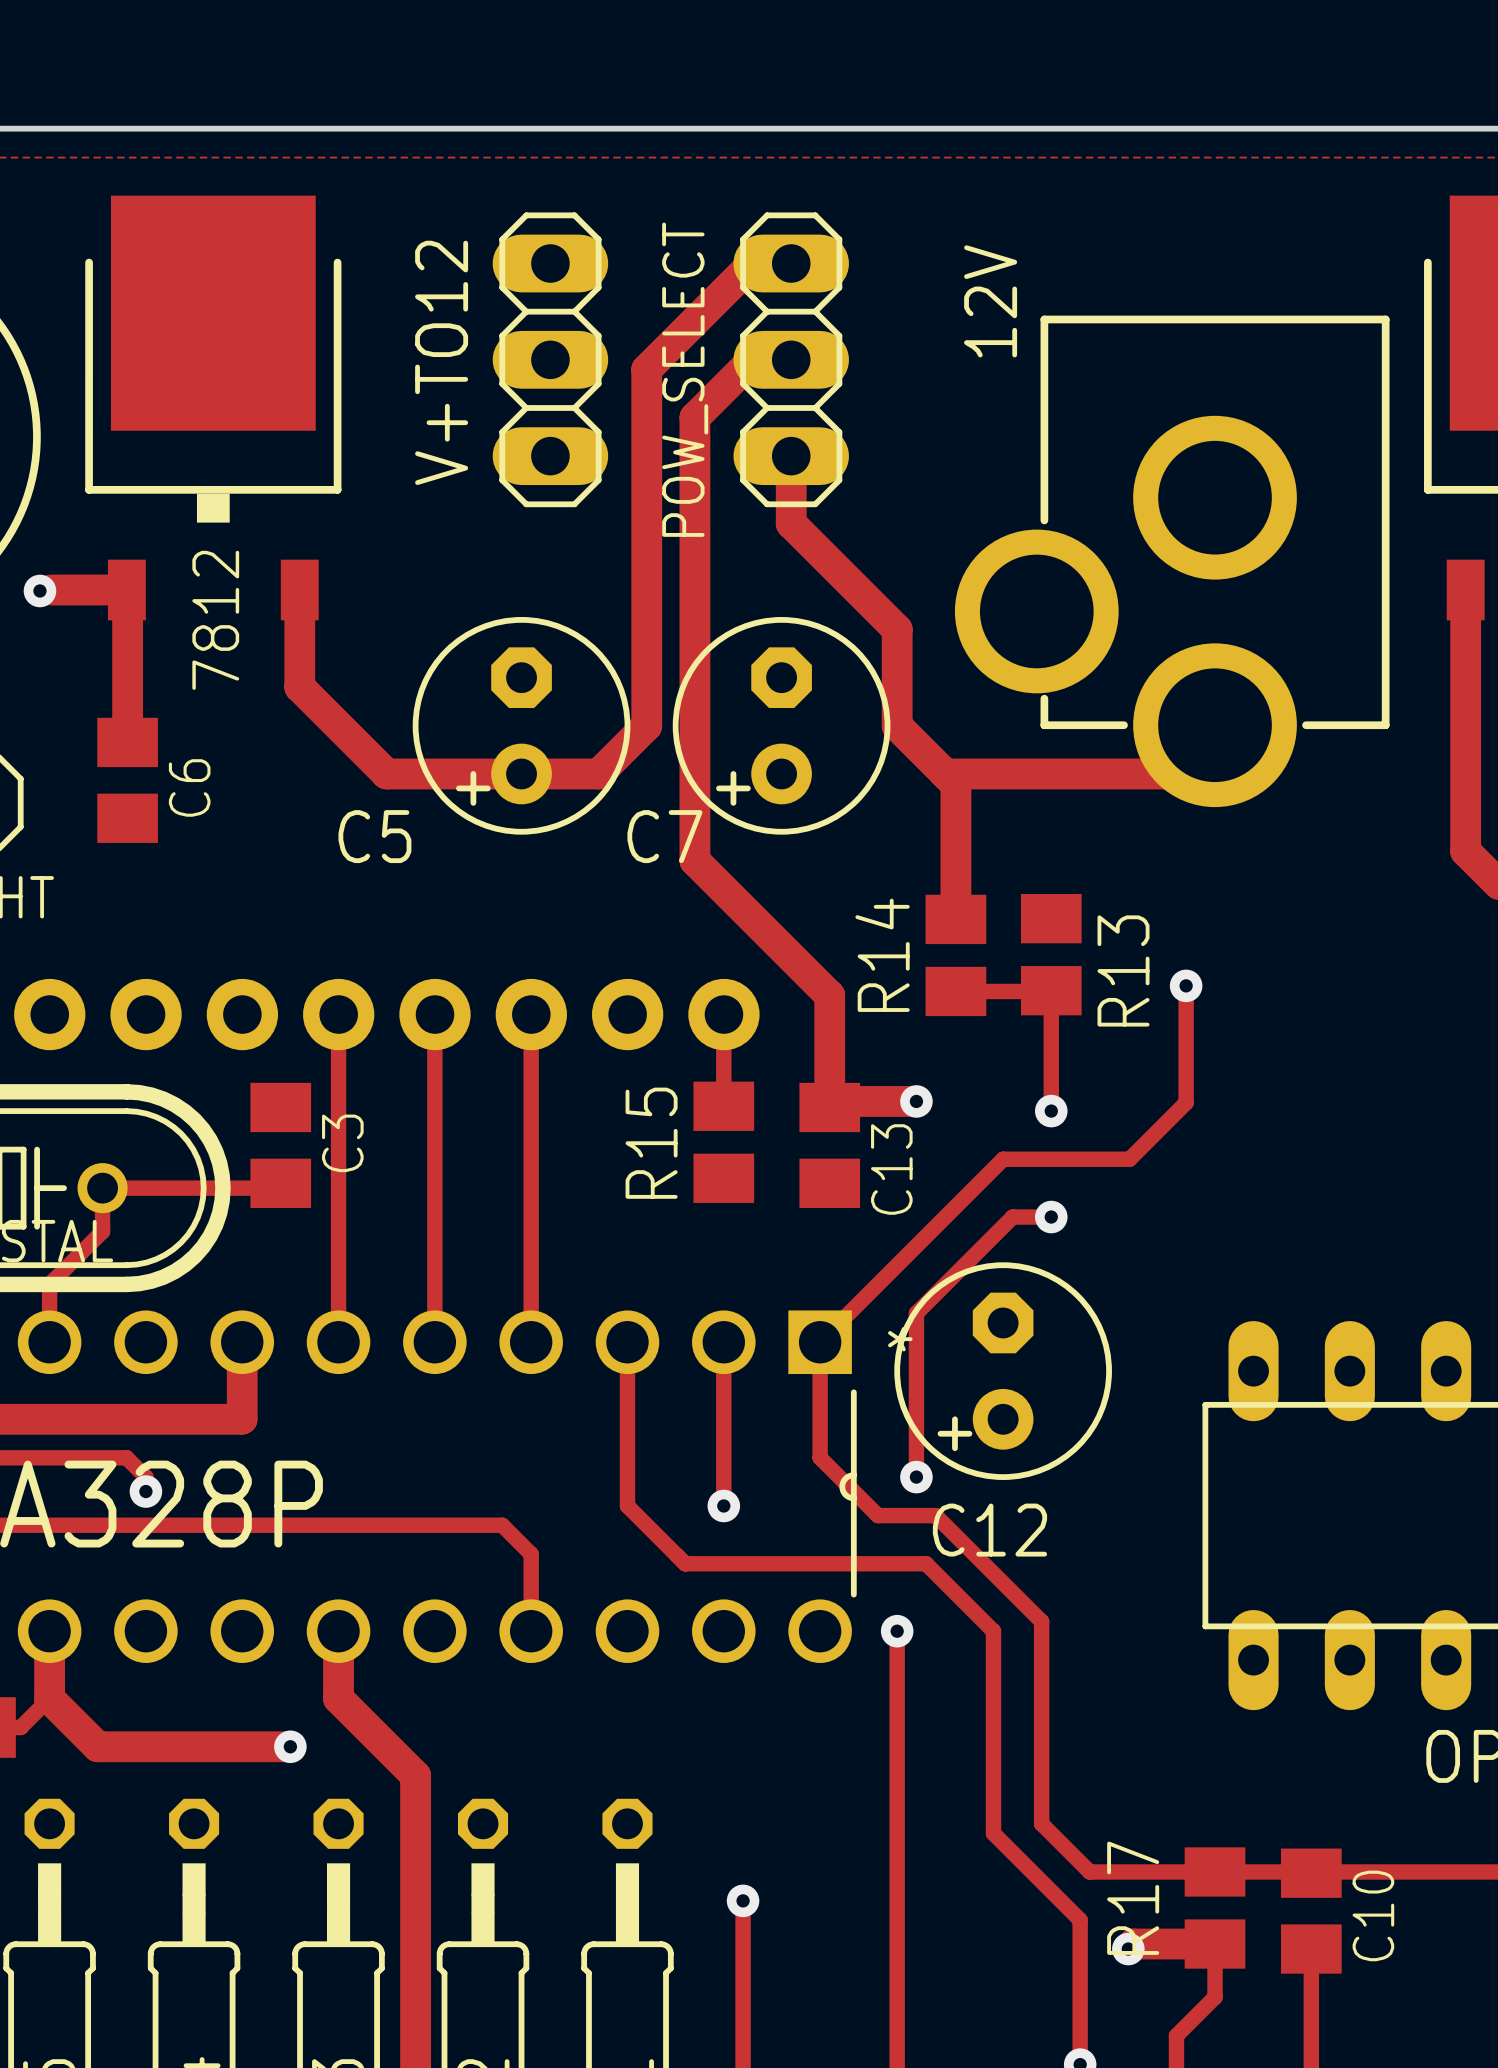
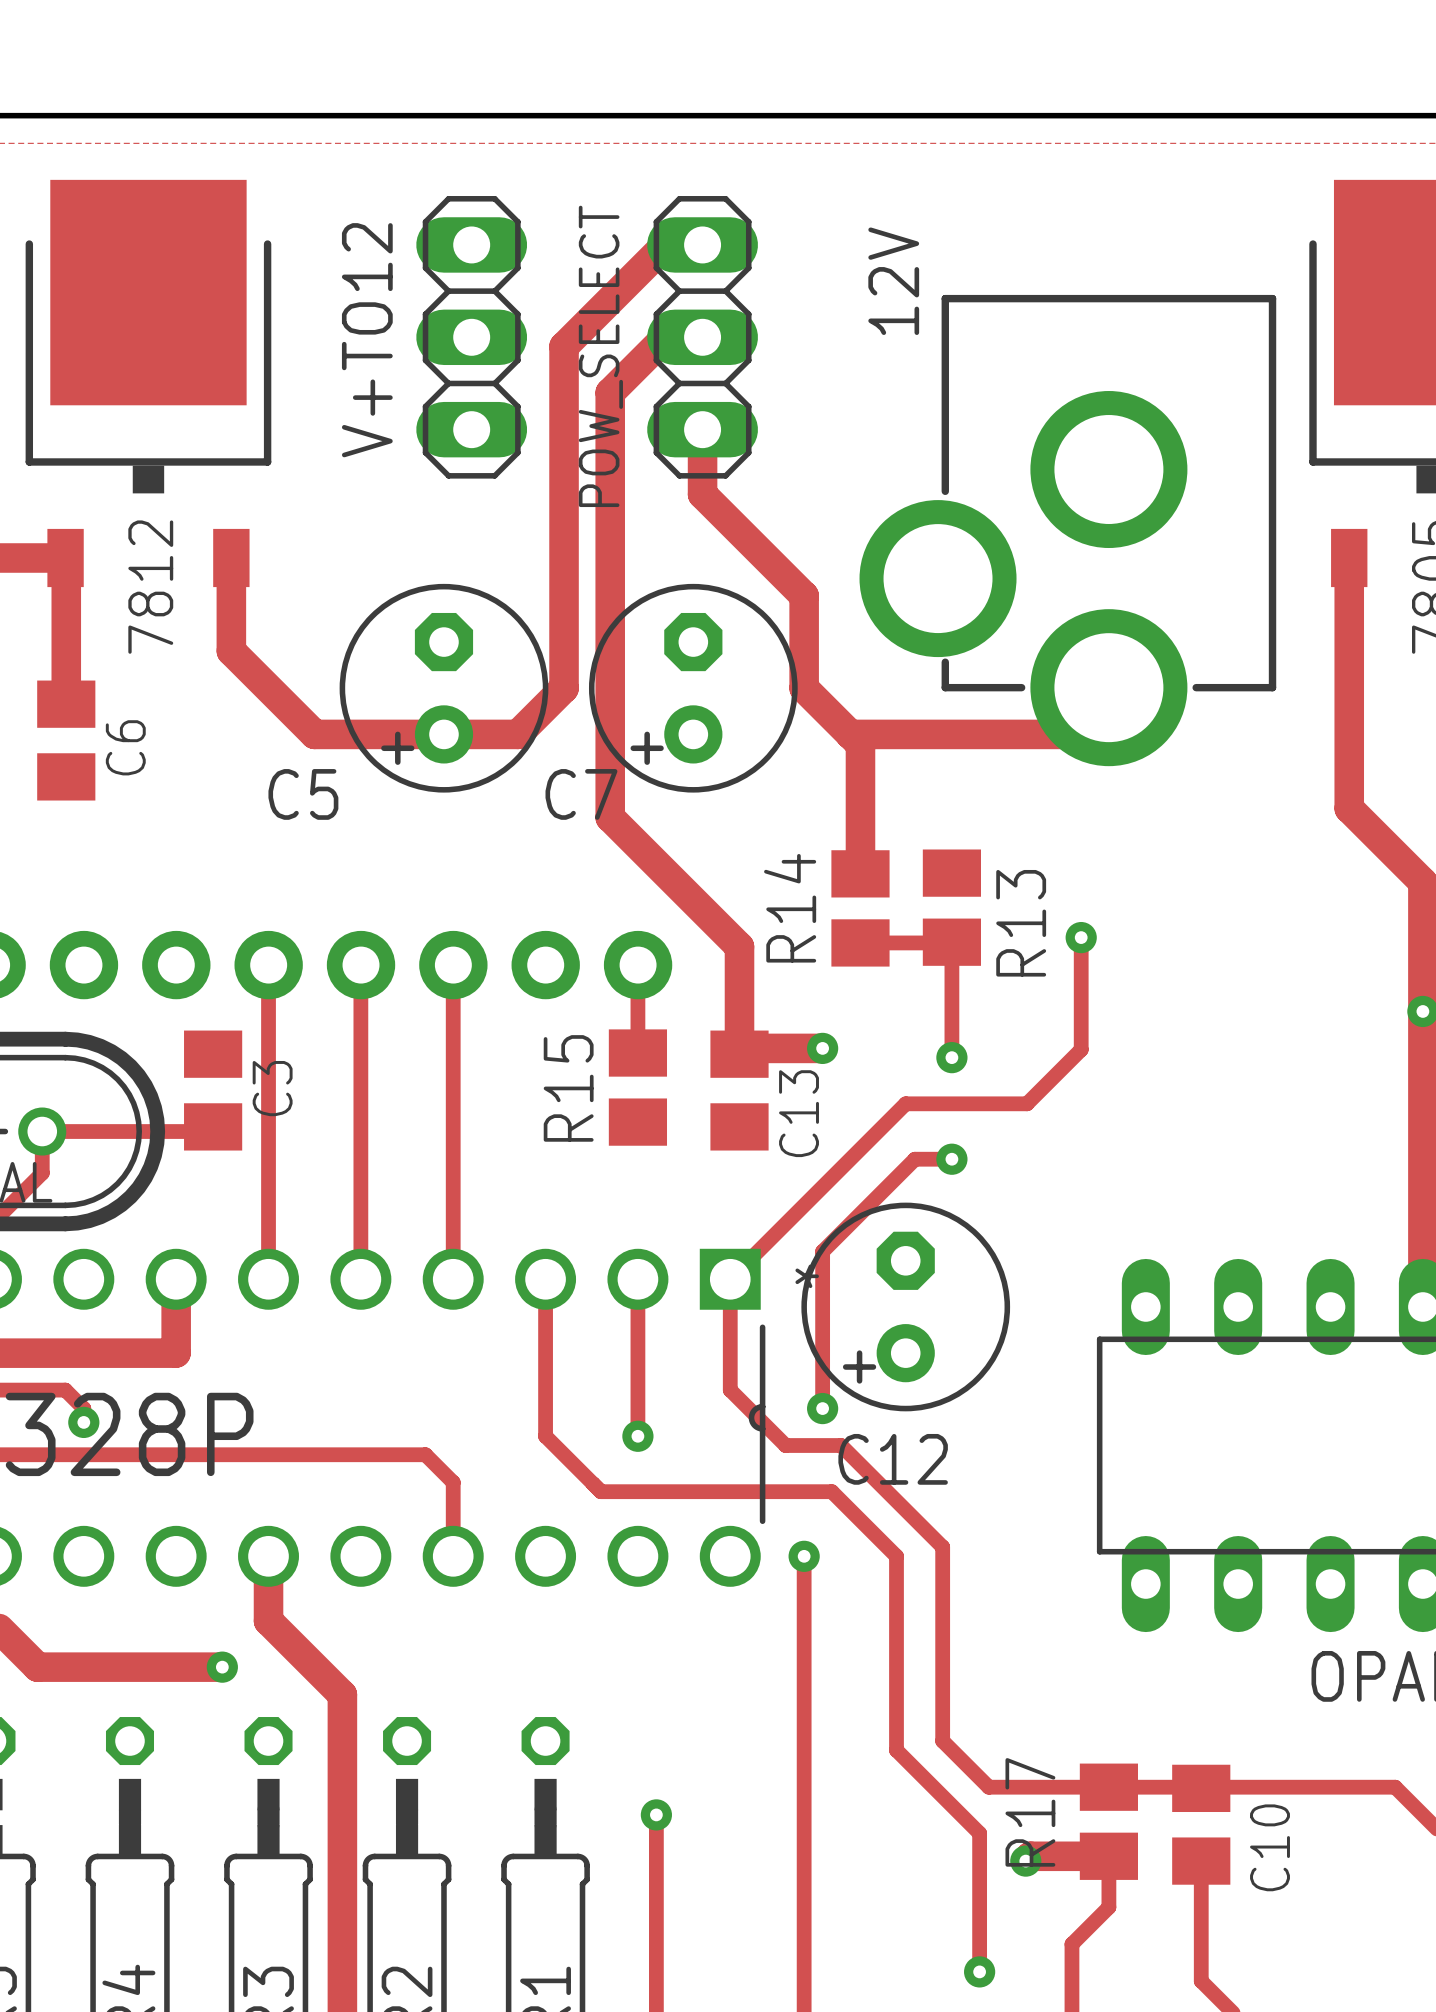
C10 name position: C10 (1373, 1915) -> C10 (1270, 1847)

